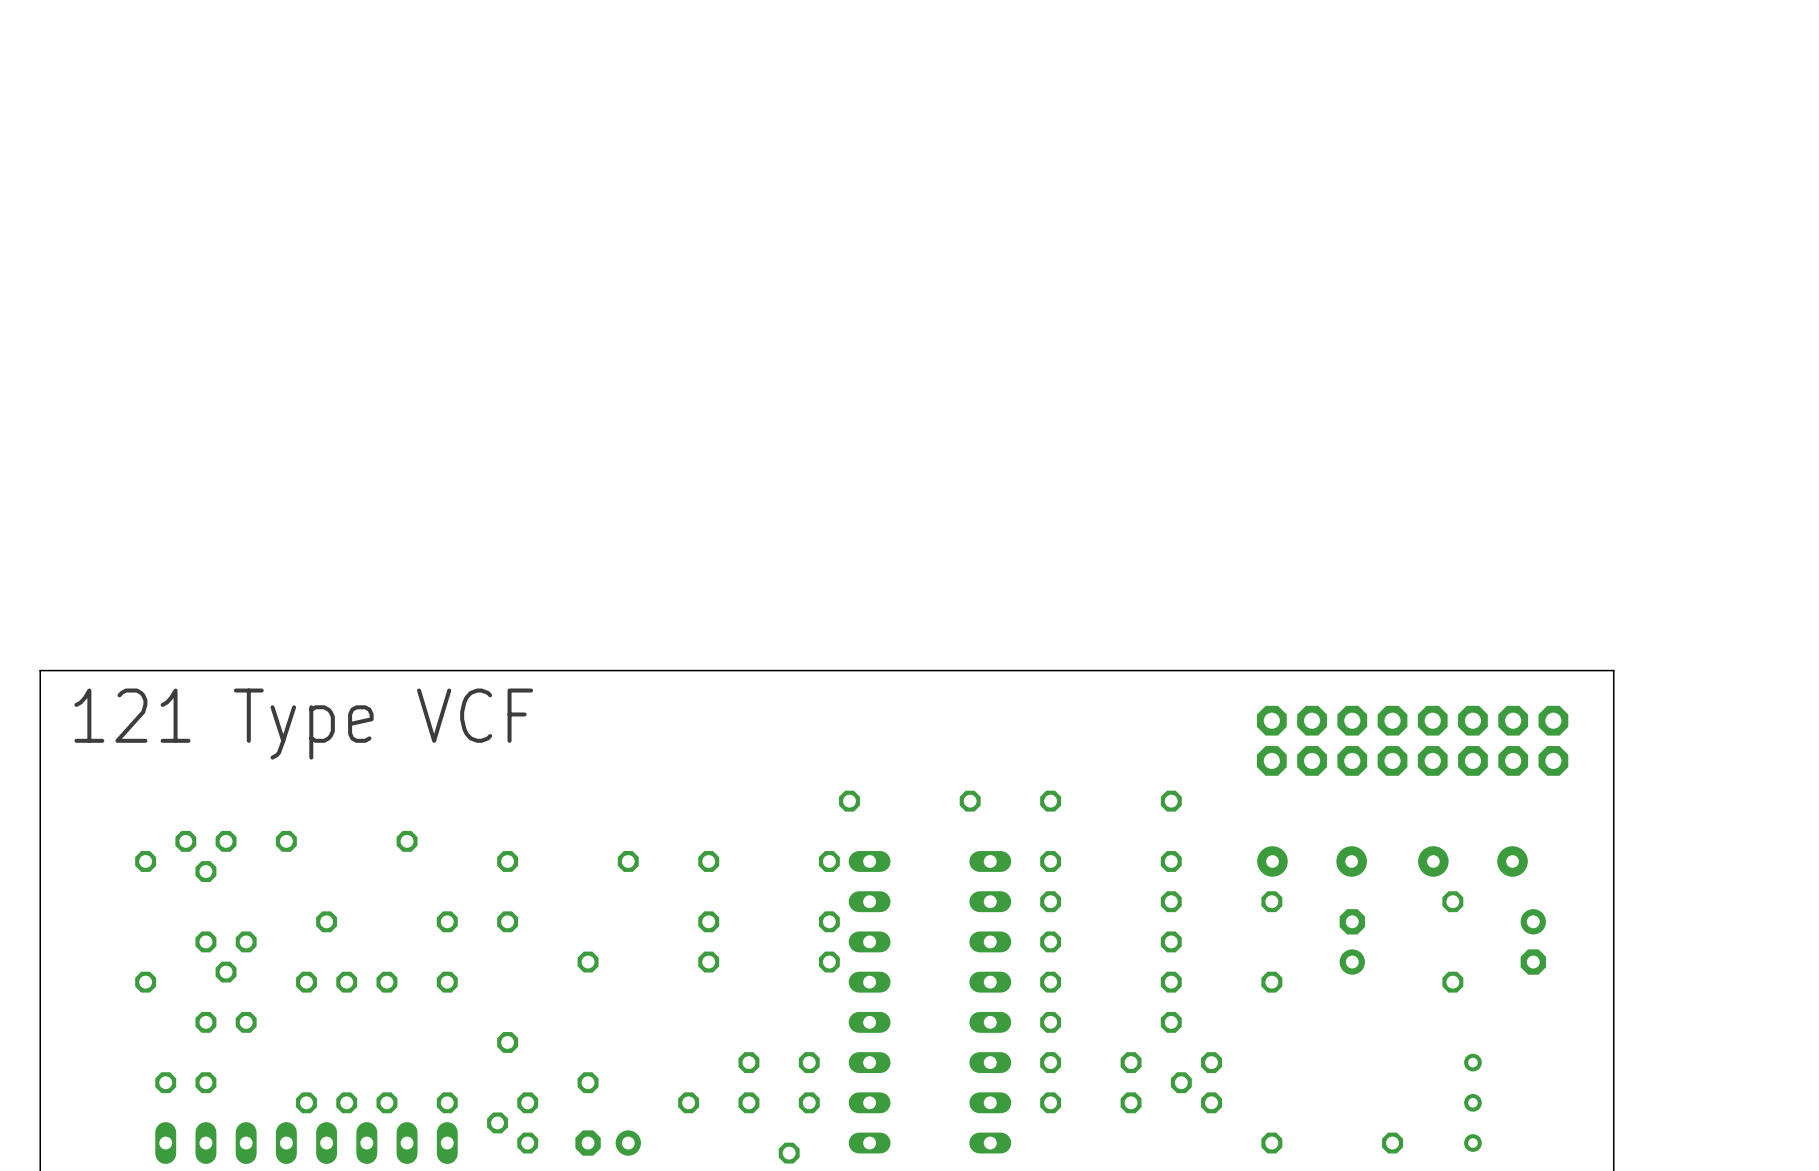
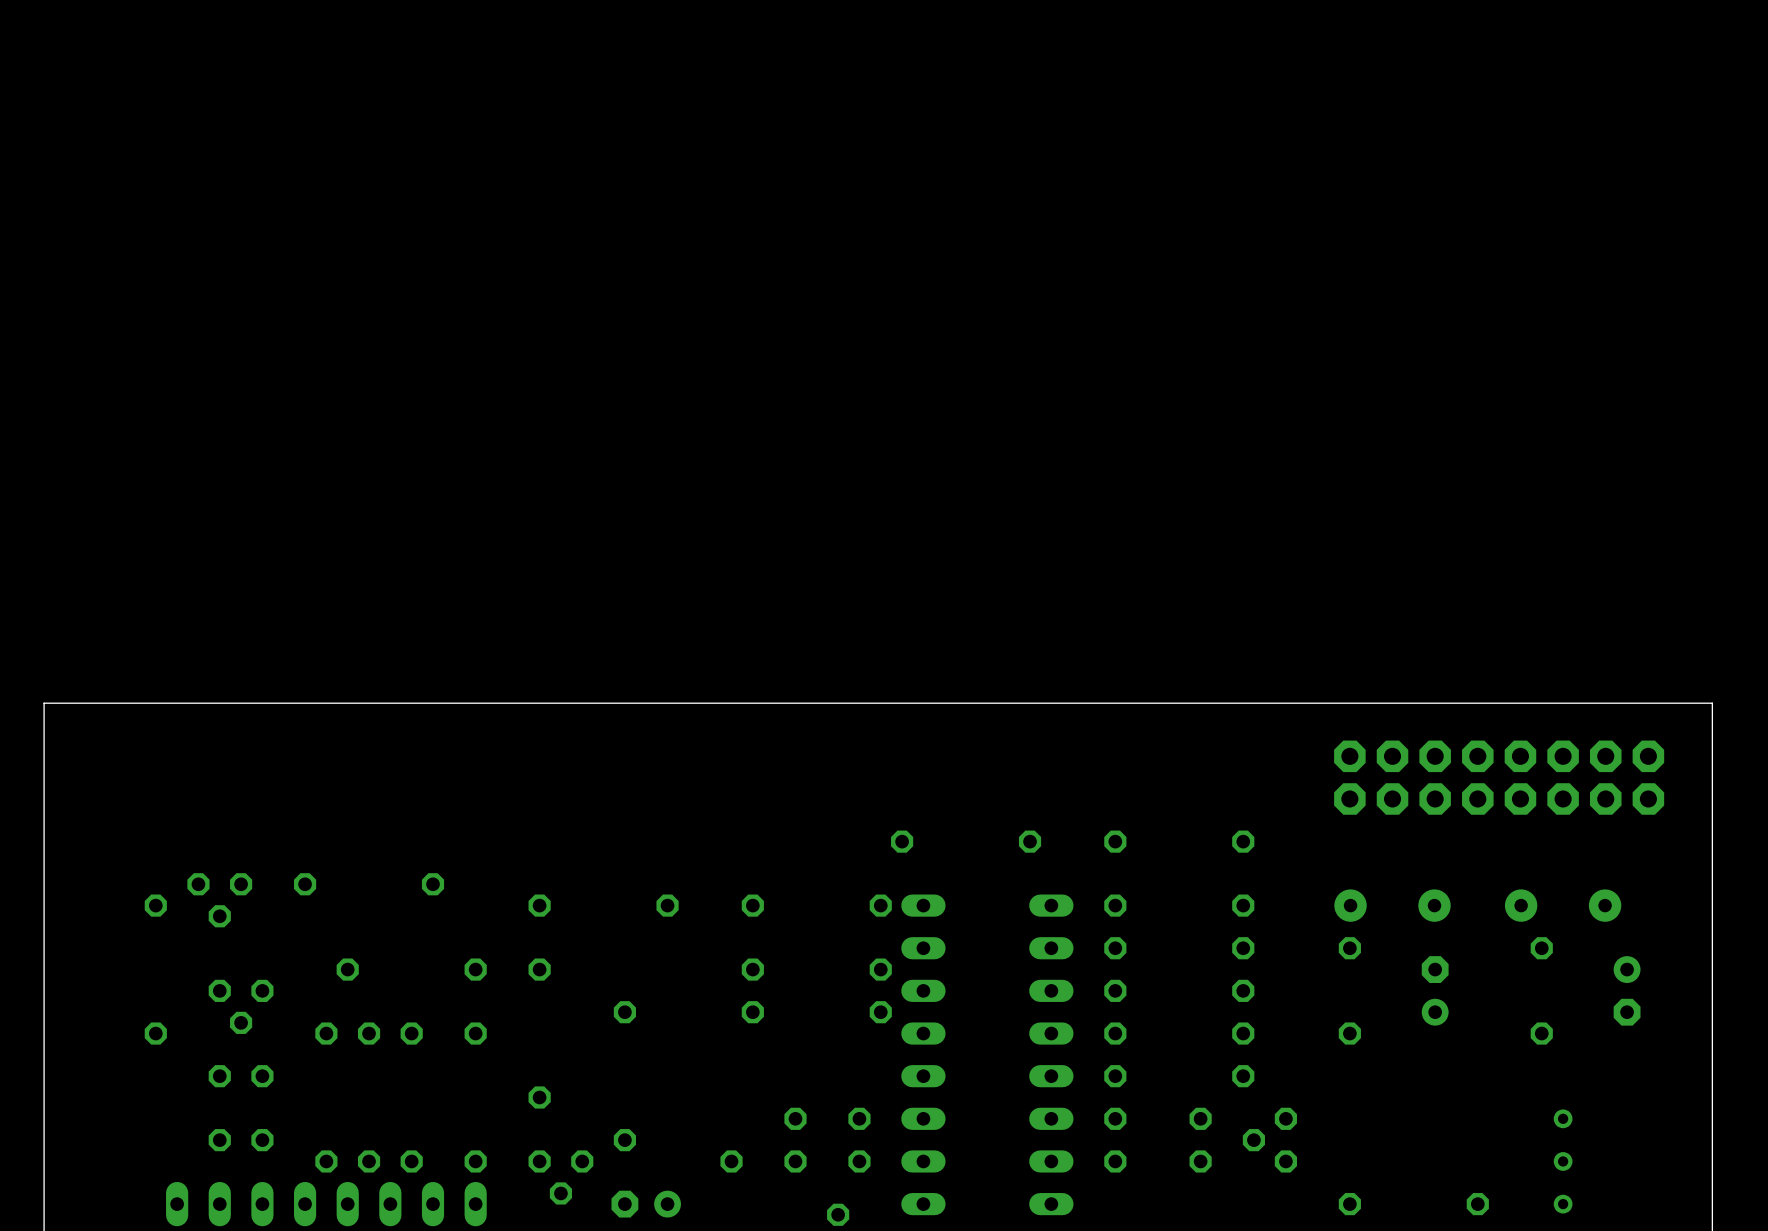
text: 121 Type VCF (303, 724) -> none
part position: (185, 1082) -> (241, 1140)
part rotation: 0° (512, 1122) -> 90° counterclockwise (560, 1177)

